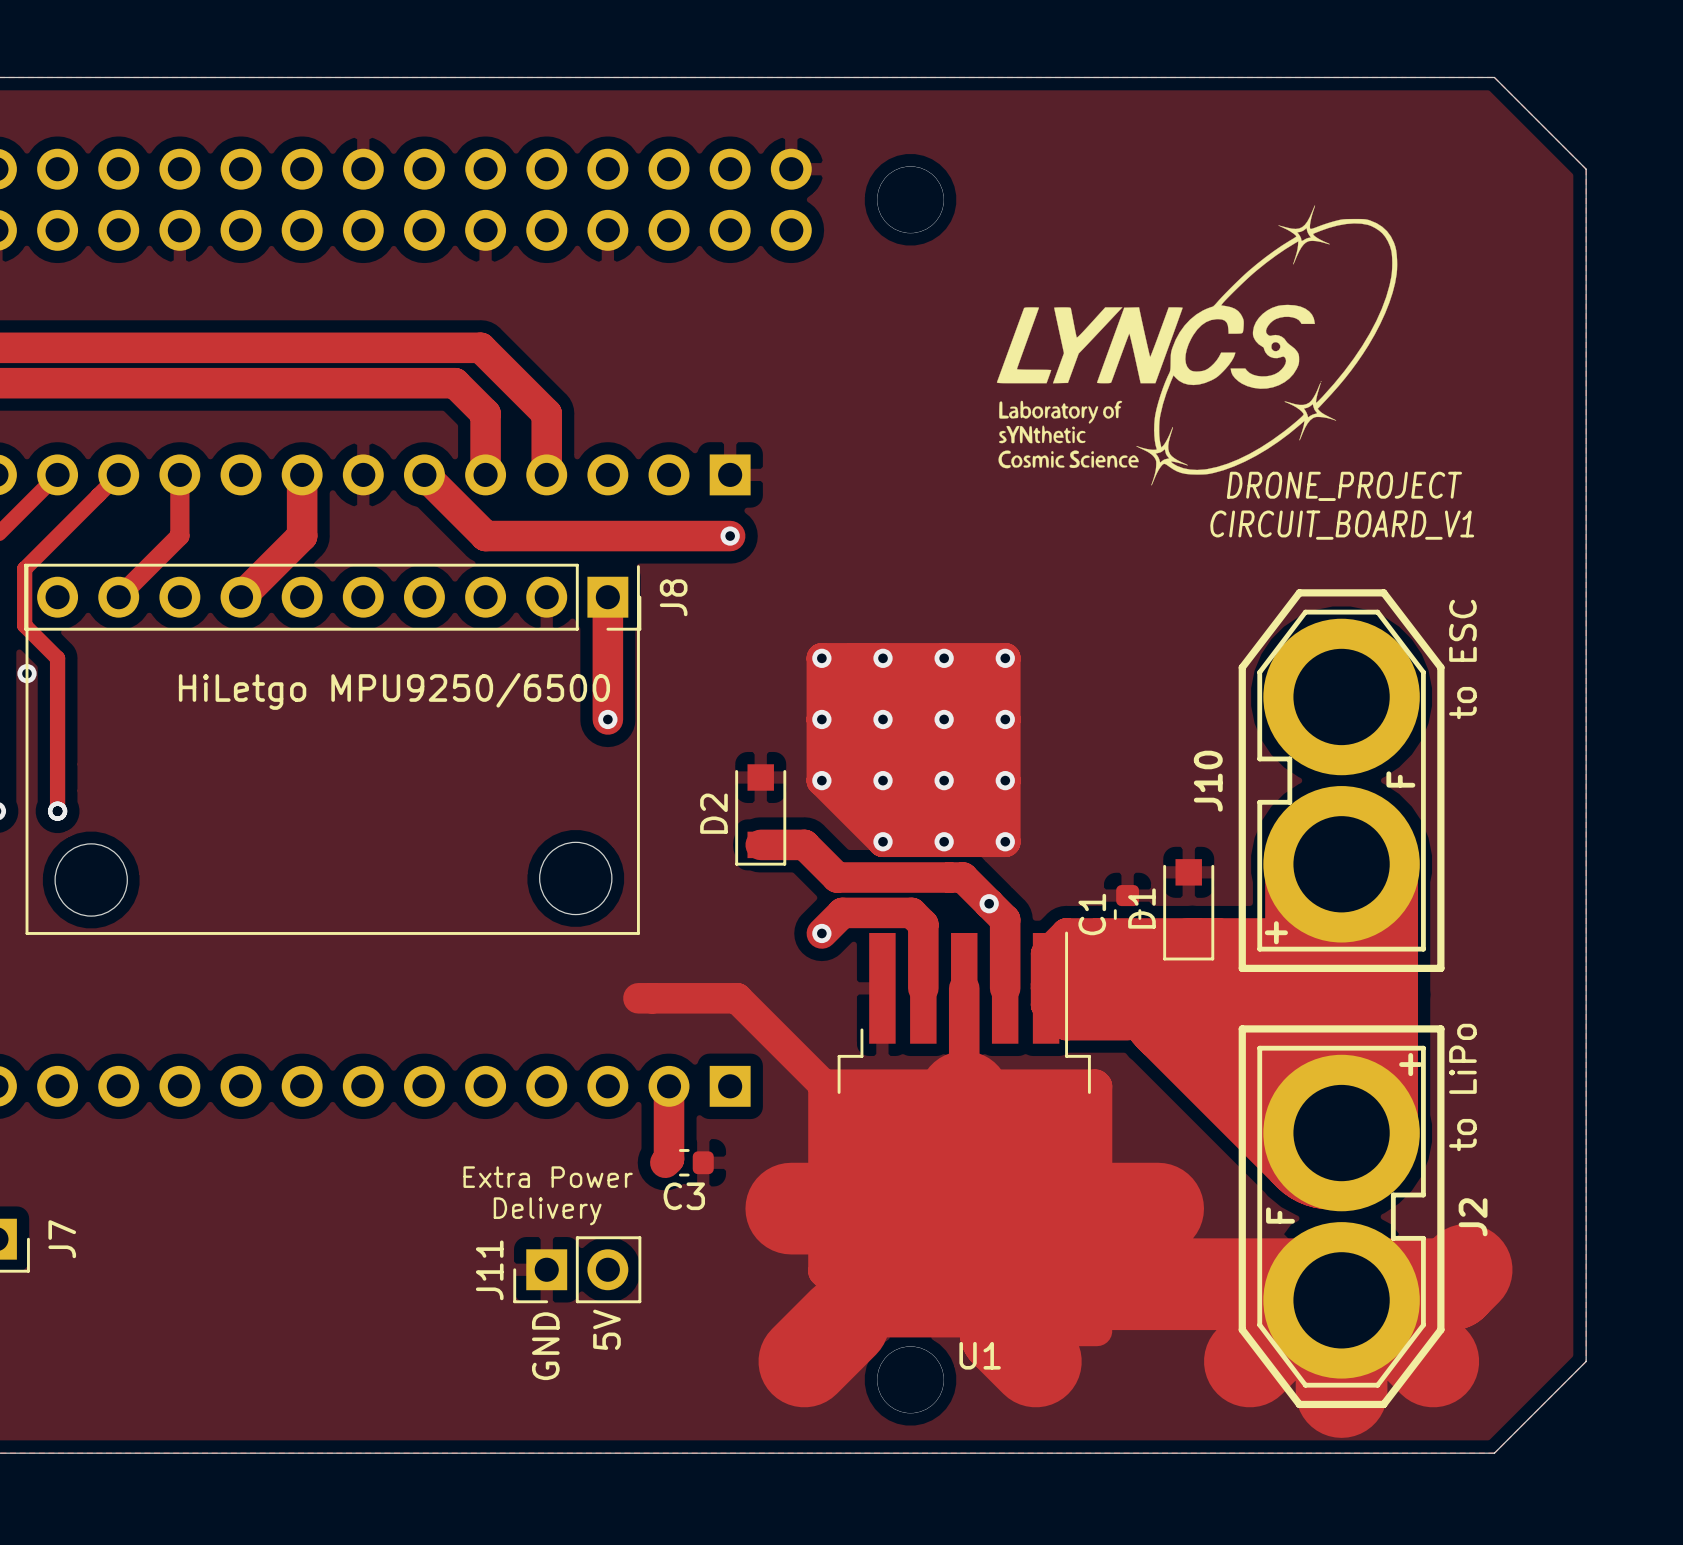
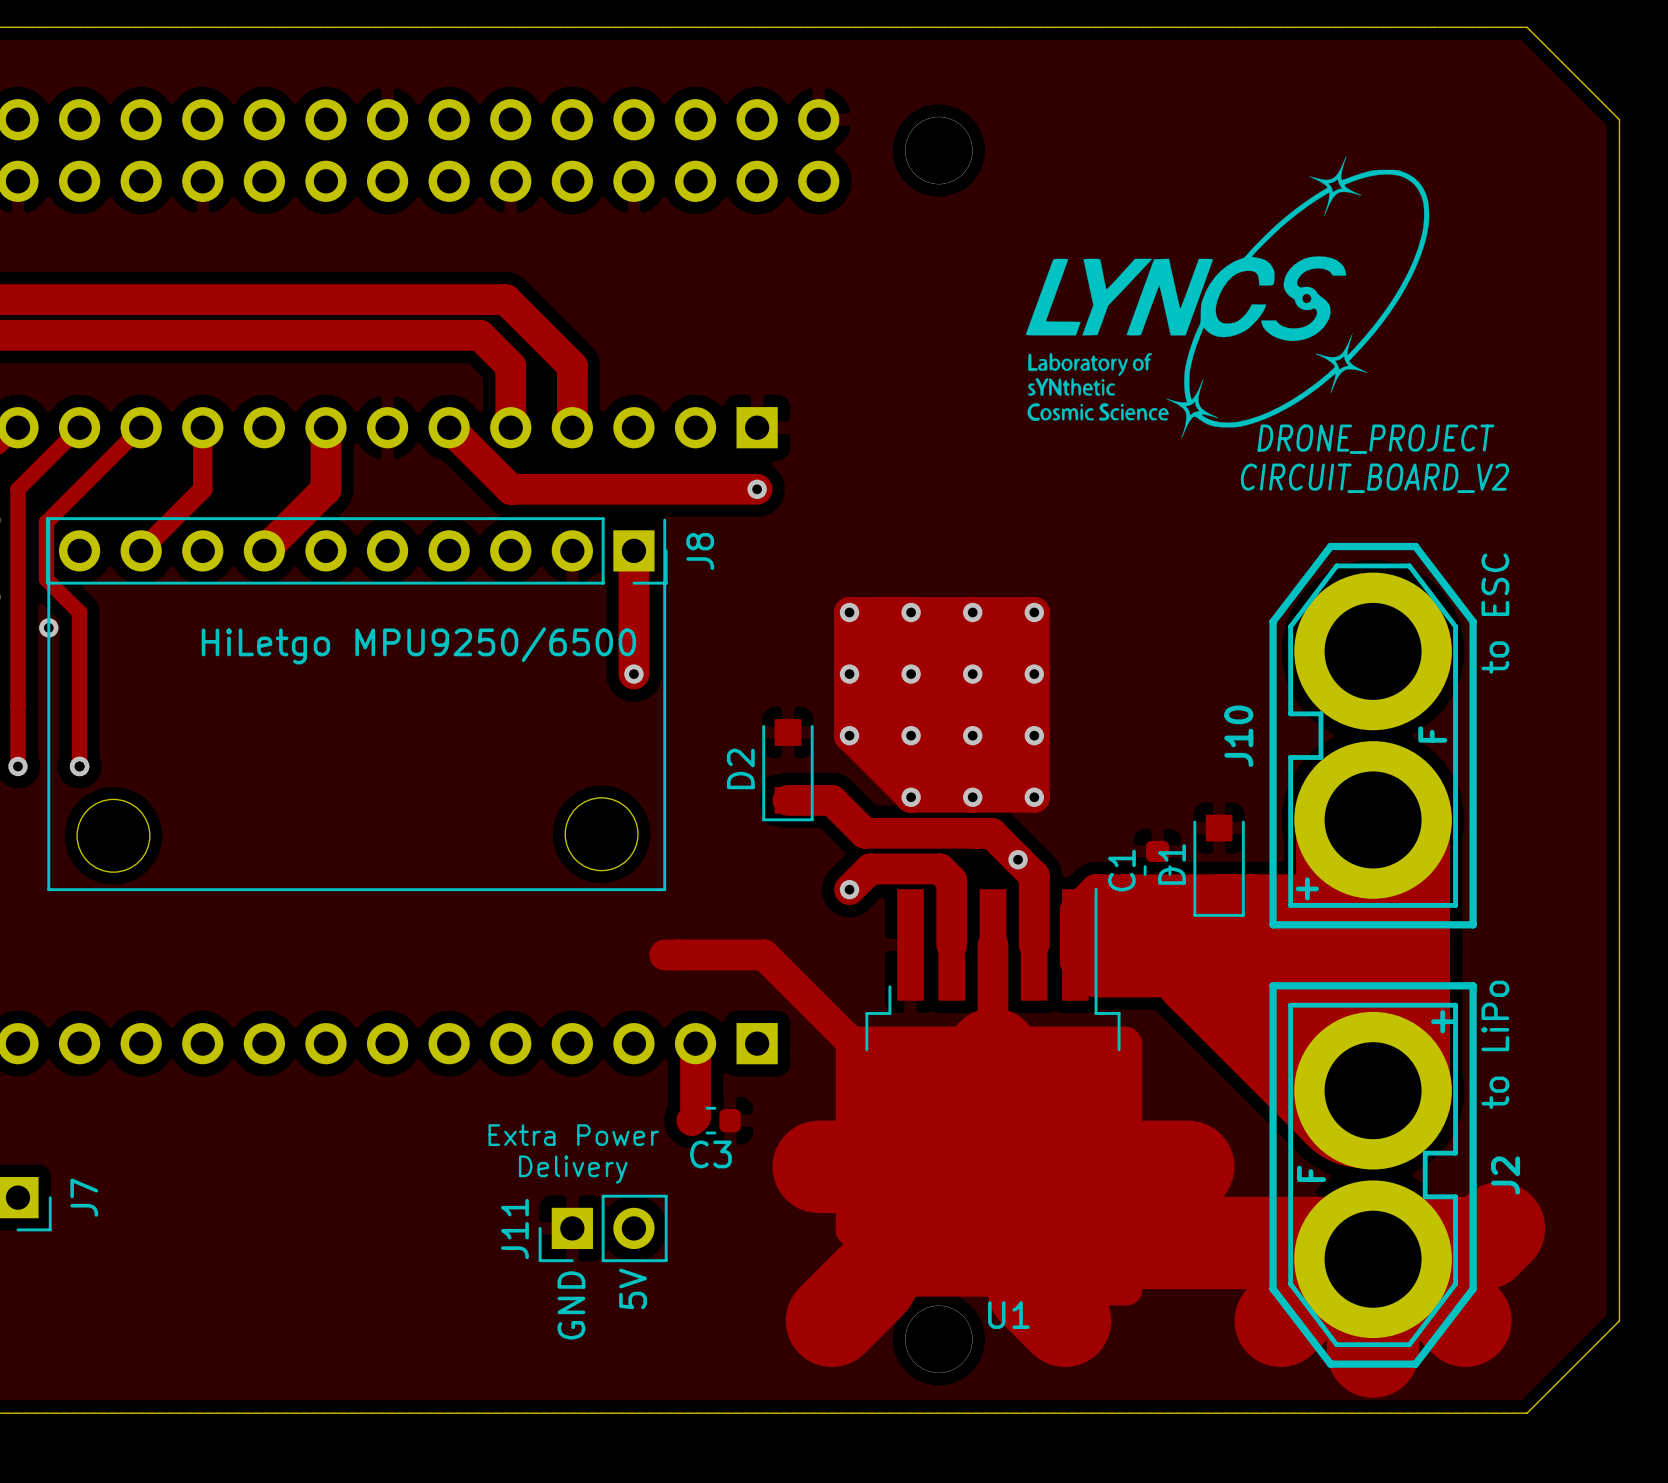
text: CIRCUIT_BOARD_V1 (1342, 525) -> CIRCUIT_BOARD_V2 (1374, 478)

